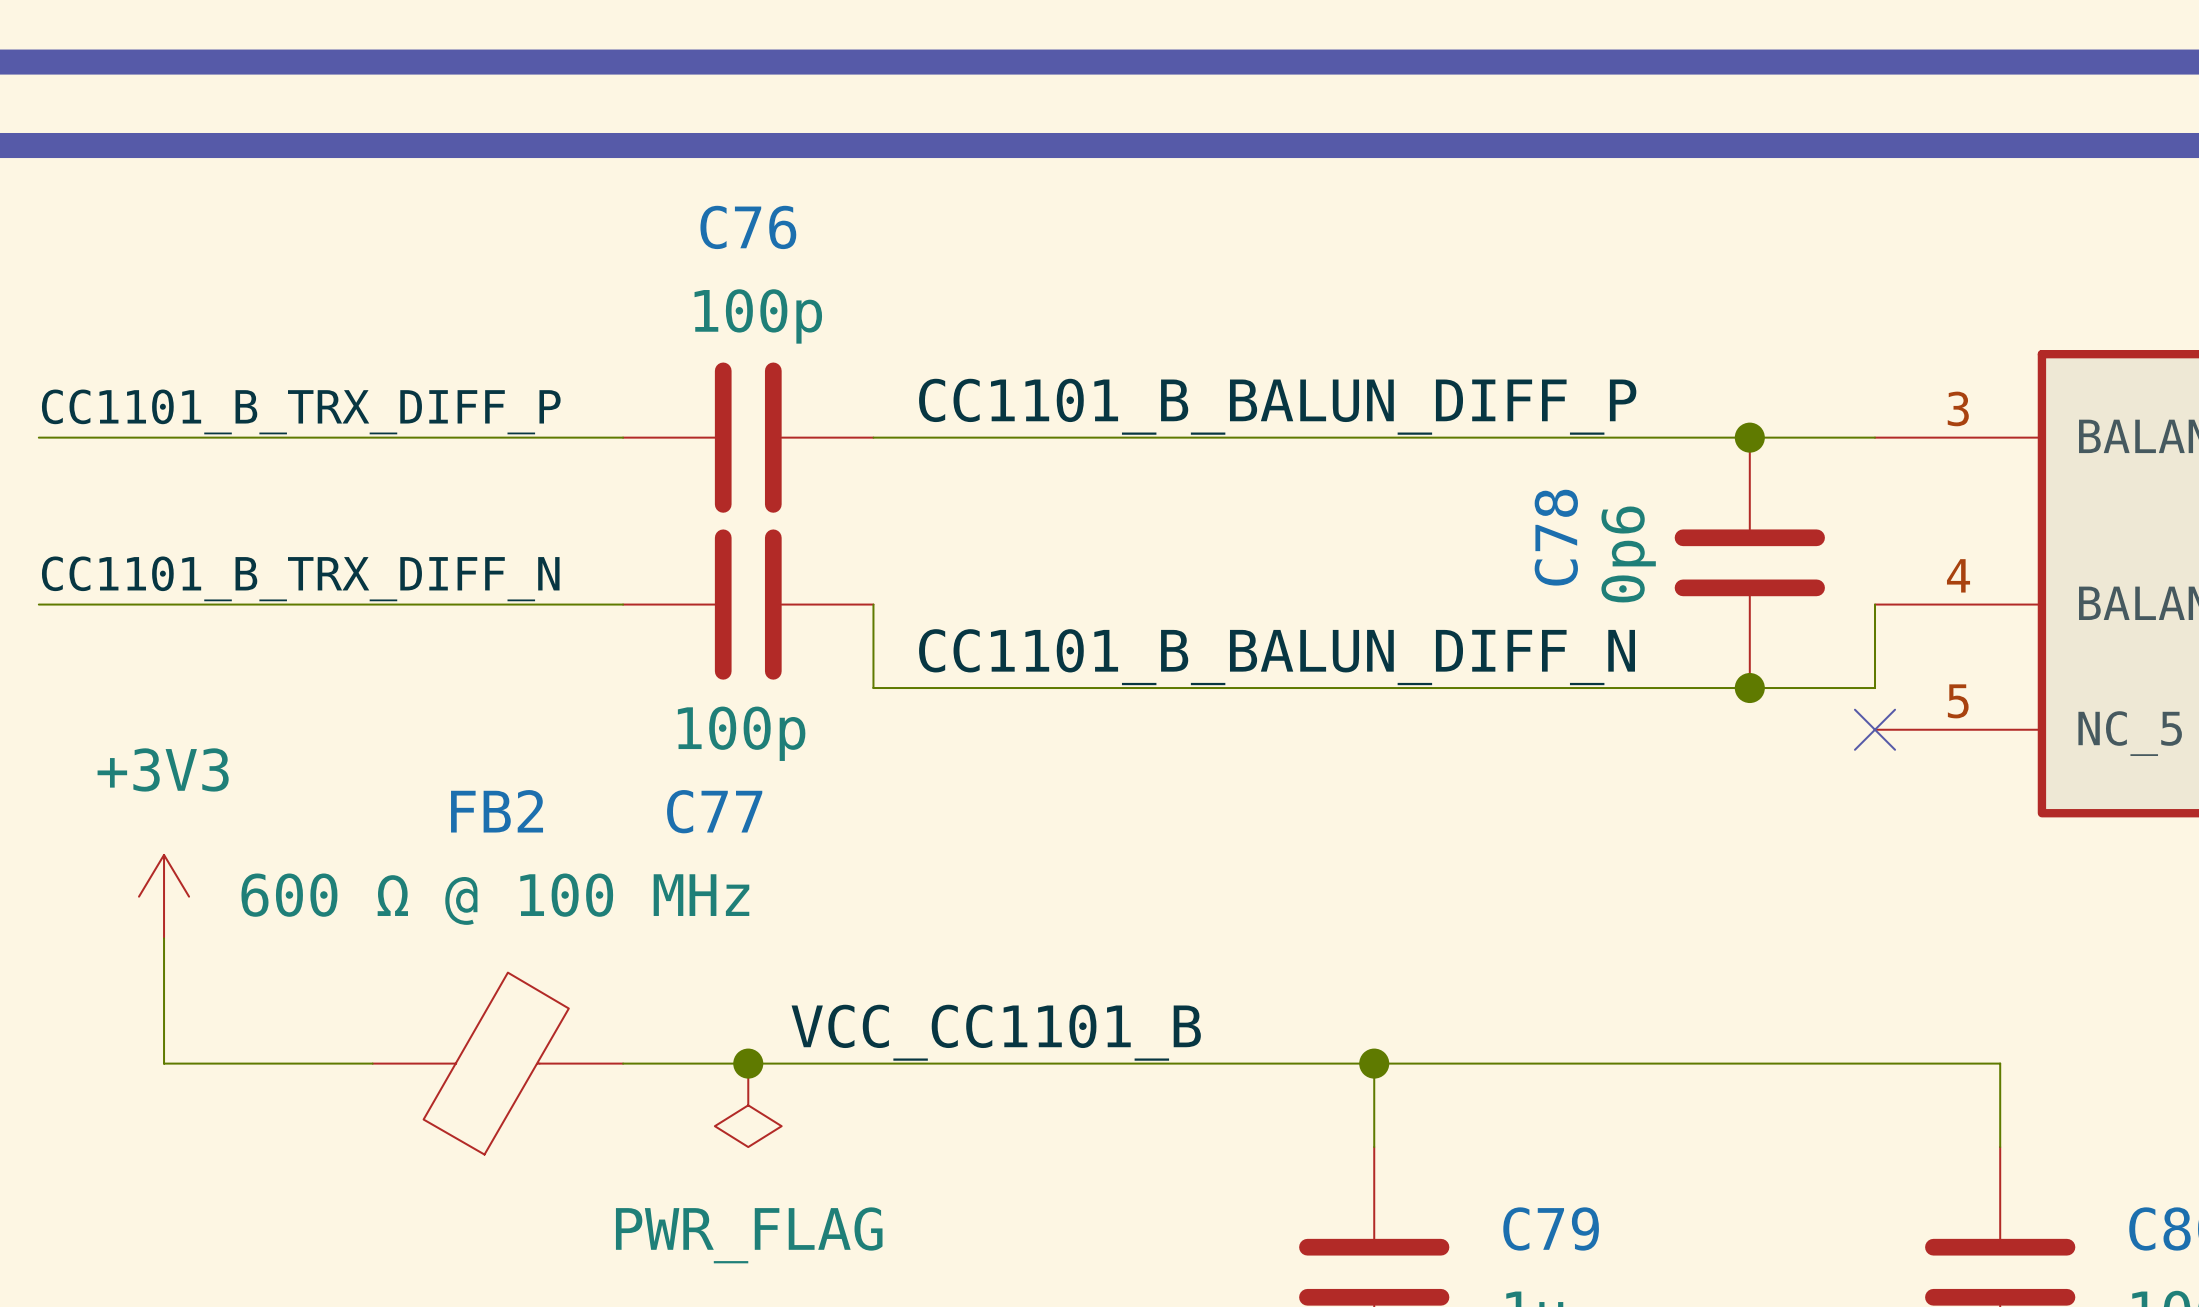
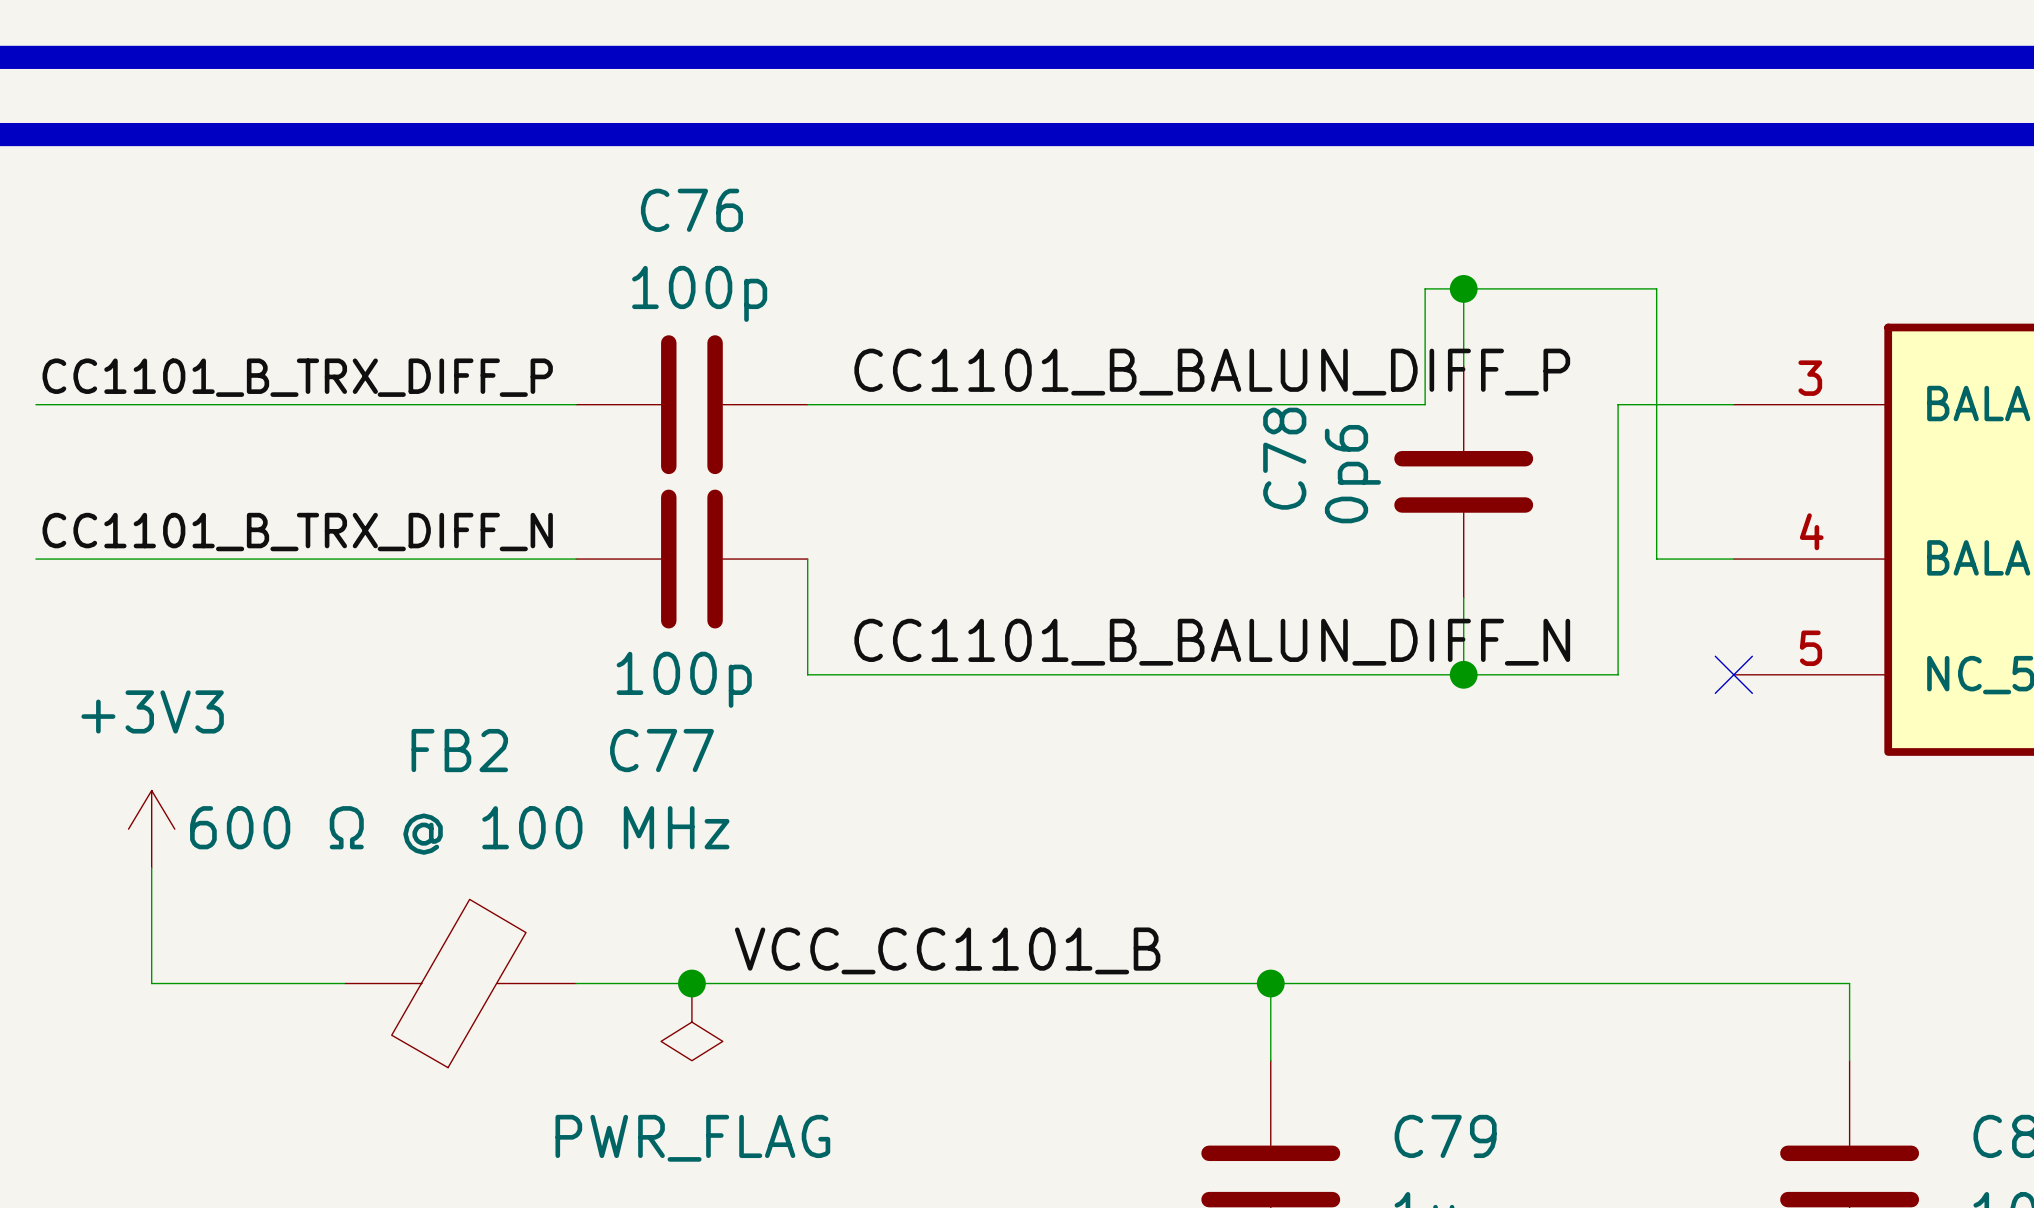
wire: none -> (1463, 288) (1463, 366)
junction: none -> (1463, 288)
wire: (1541, 437) (1749, 437) -> (1425, 404) (1425, 288) (1656, 288) (1656, 559) (1733, 559)
junction: (1749, 437) -> none
C78 position: (1749, 562) -> (1463, 481)
wire: (1875, 604) (1875, 688) (873, 688) -> (1618, 404) (1618, 674) (807, 674) (807, 636)
wire: none -> (1463, 597) (1463, 674)
label position: CC1101_B_BALUN_DIFF_N (1277, 657) -> CC1101_B_BALUN_DIFF_N (1212, 642)
junction: (1749, 688) -> none
junction: none -> (1463, 674)

